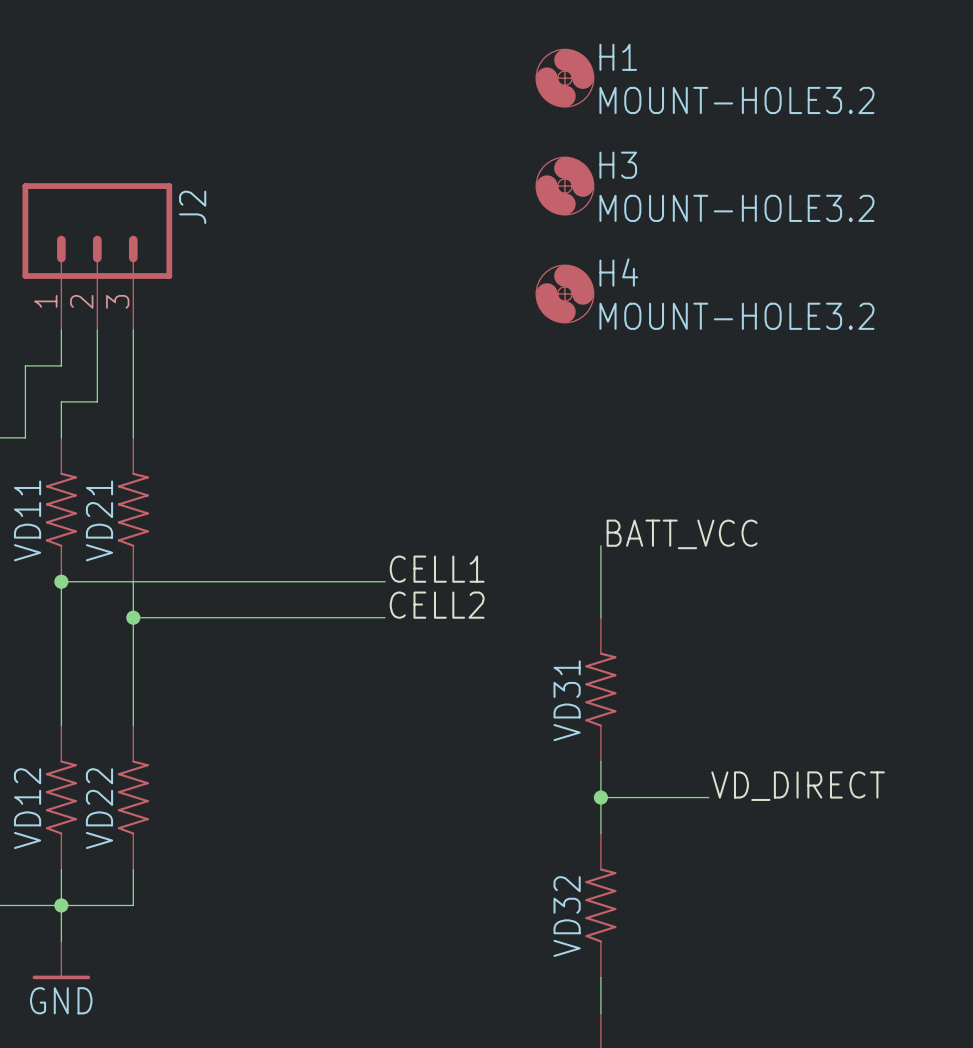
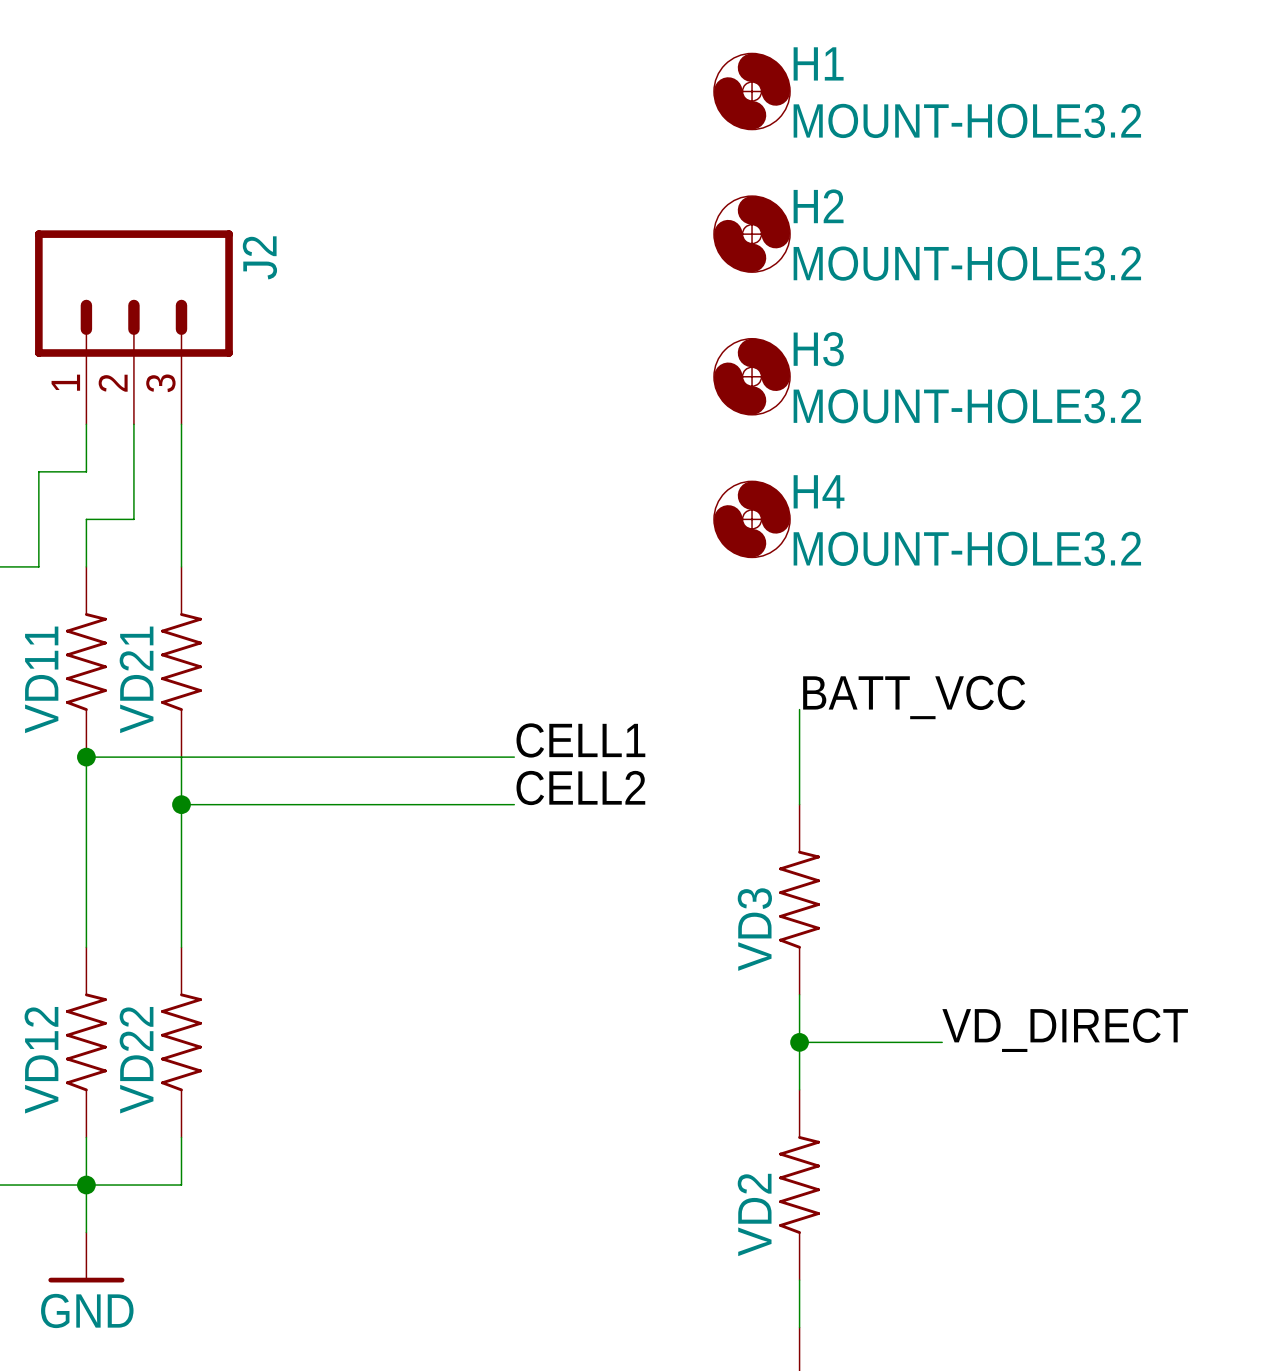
H3 name: H3 (618, 165) -> H2 (818, 206)
H4 name: H4 (618, 272) -> H3 (818, 349)
H4: none -> MOUNT-HOLE3.2 (752, 519)
VD31 name: VD31 (567, 700) -> VD3 (754, 929)
VD32 name: VD32 (567, 916) -> VD2 (754, 1214)

